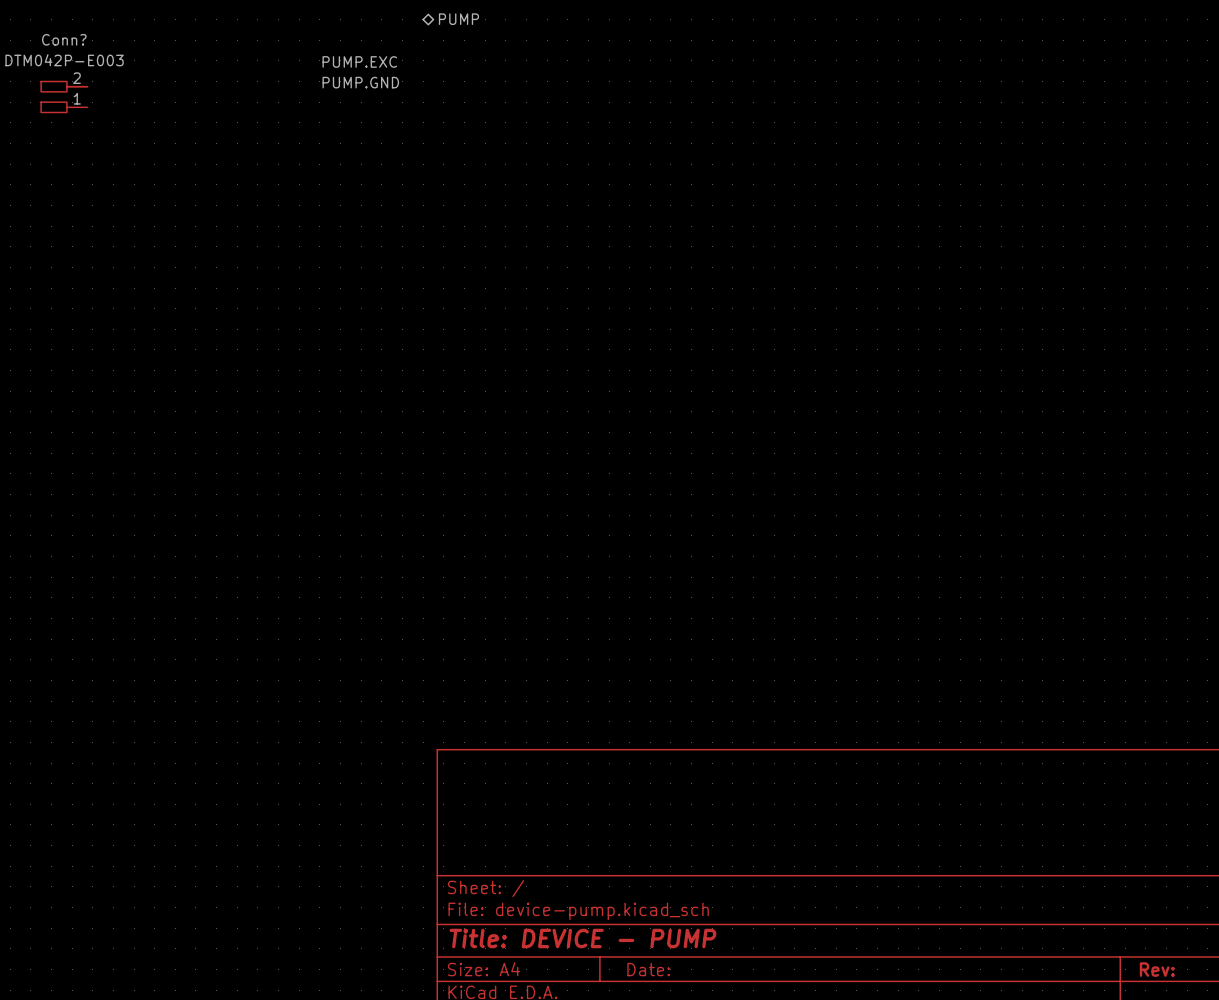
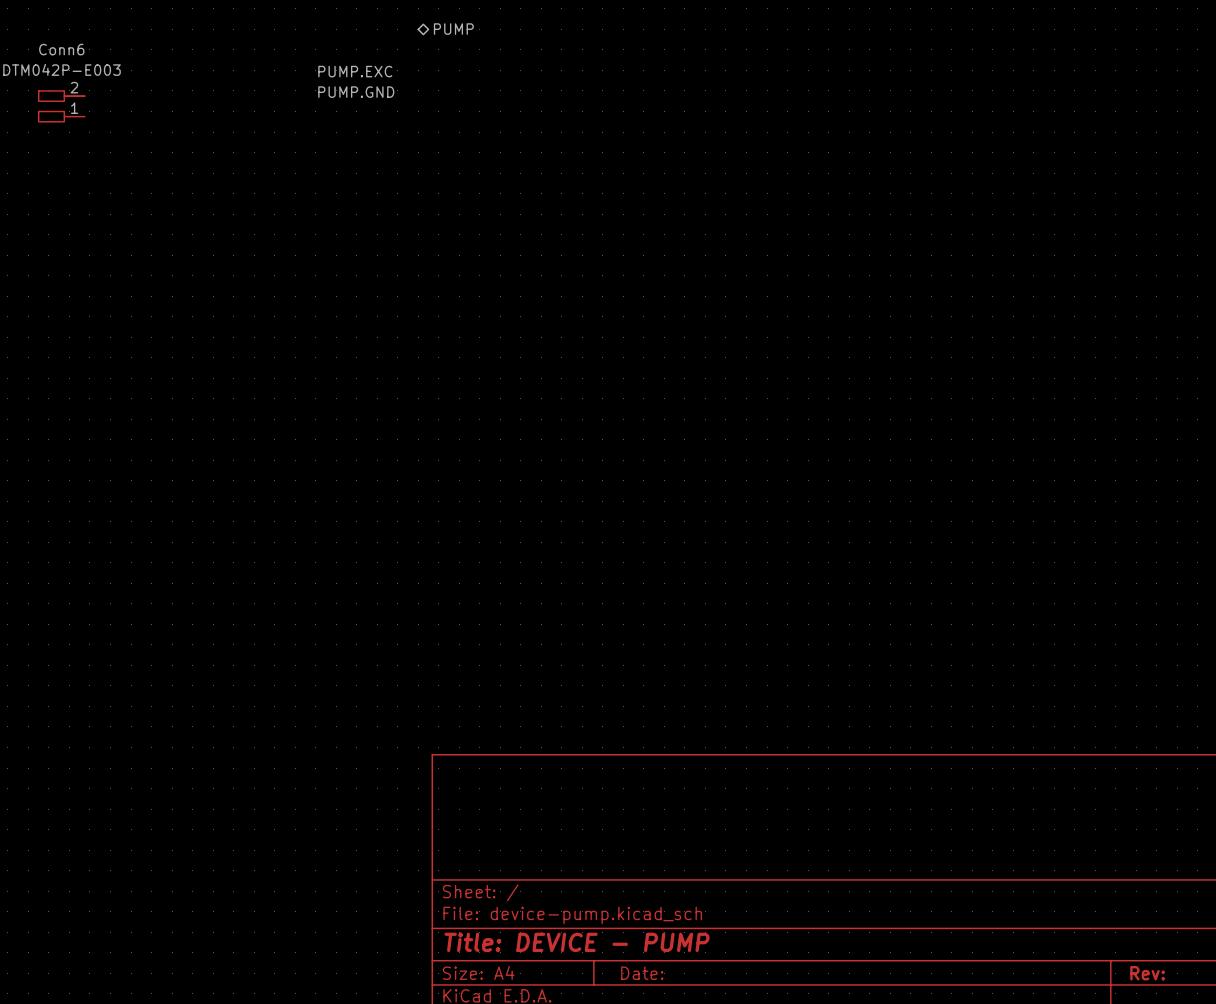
Conn? name: Conn? (64, 39) -> Conn6 (61, 49)

